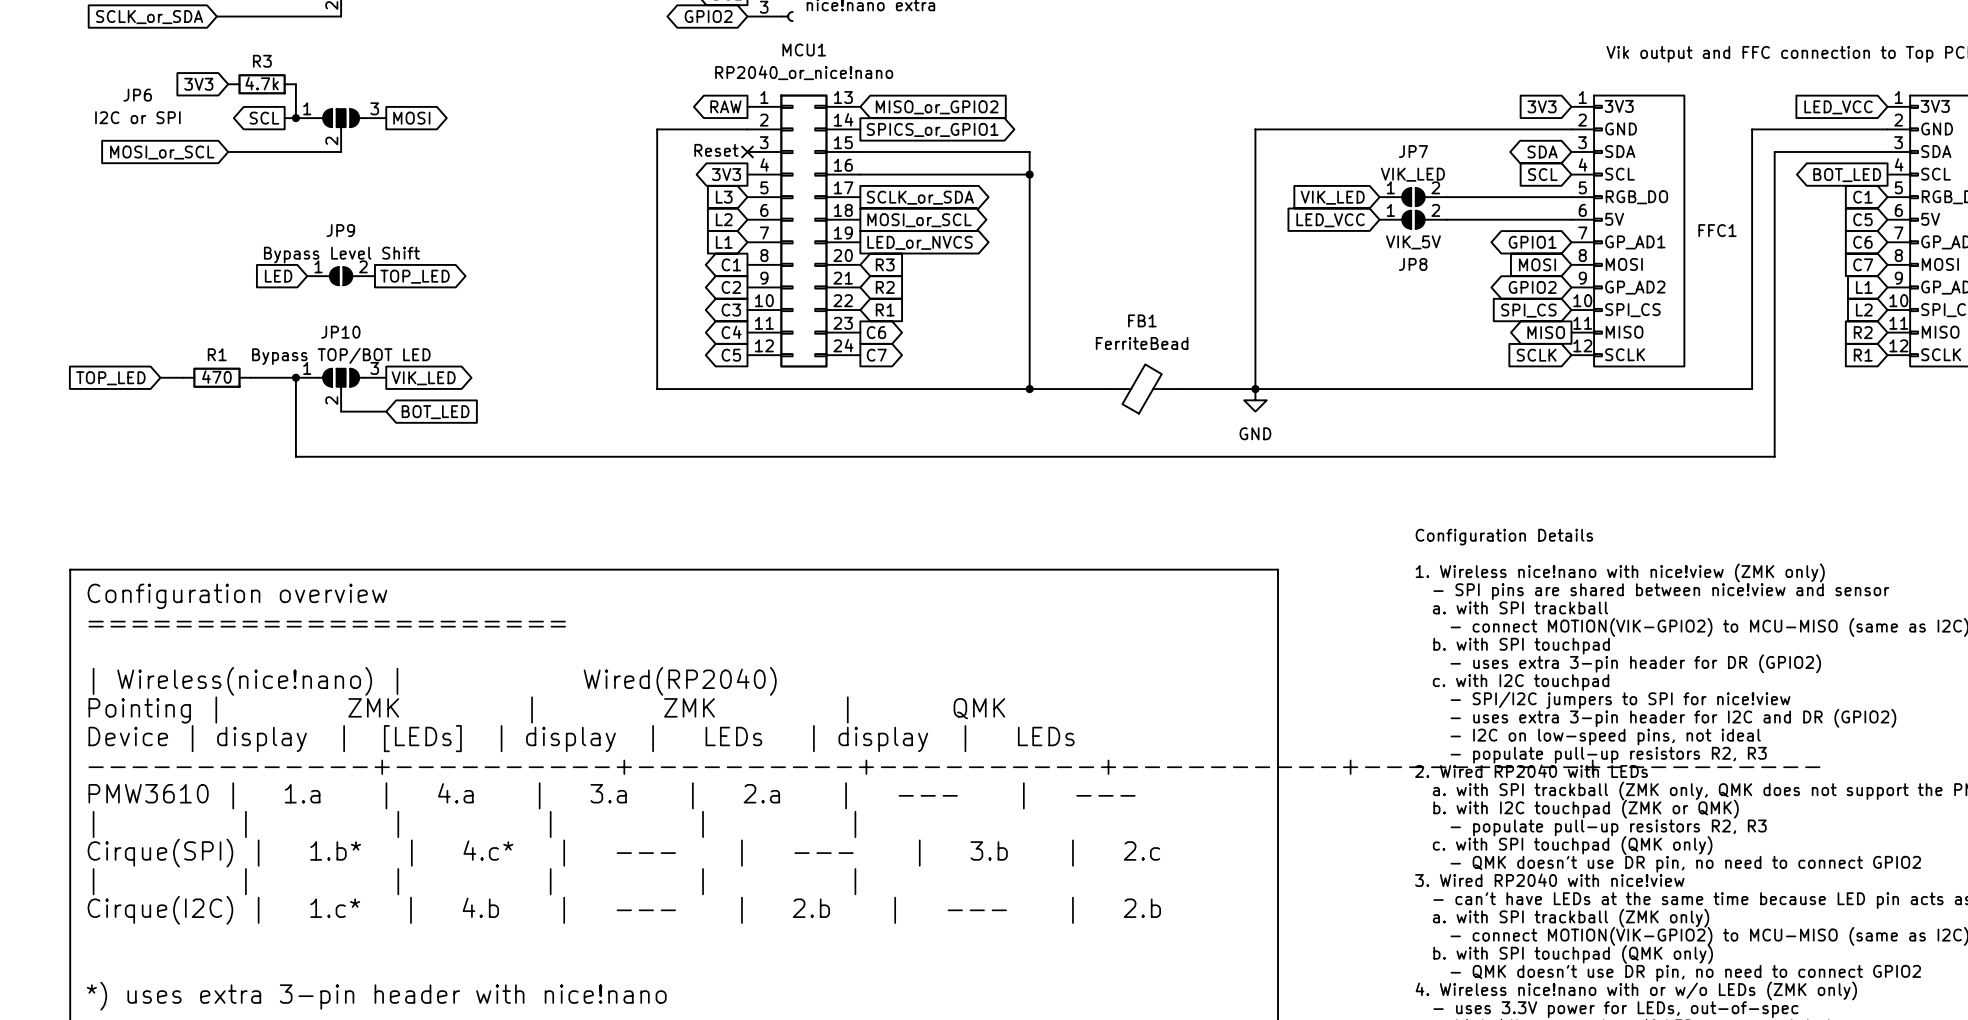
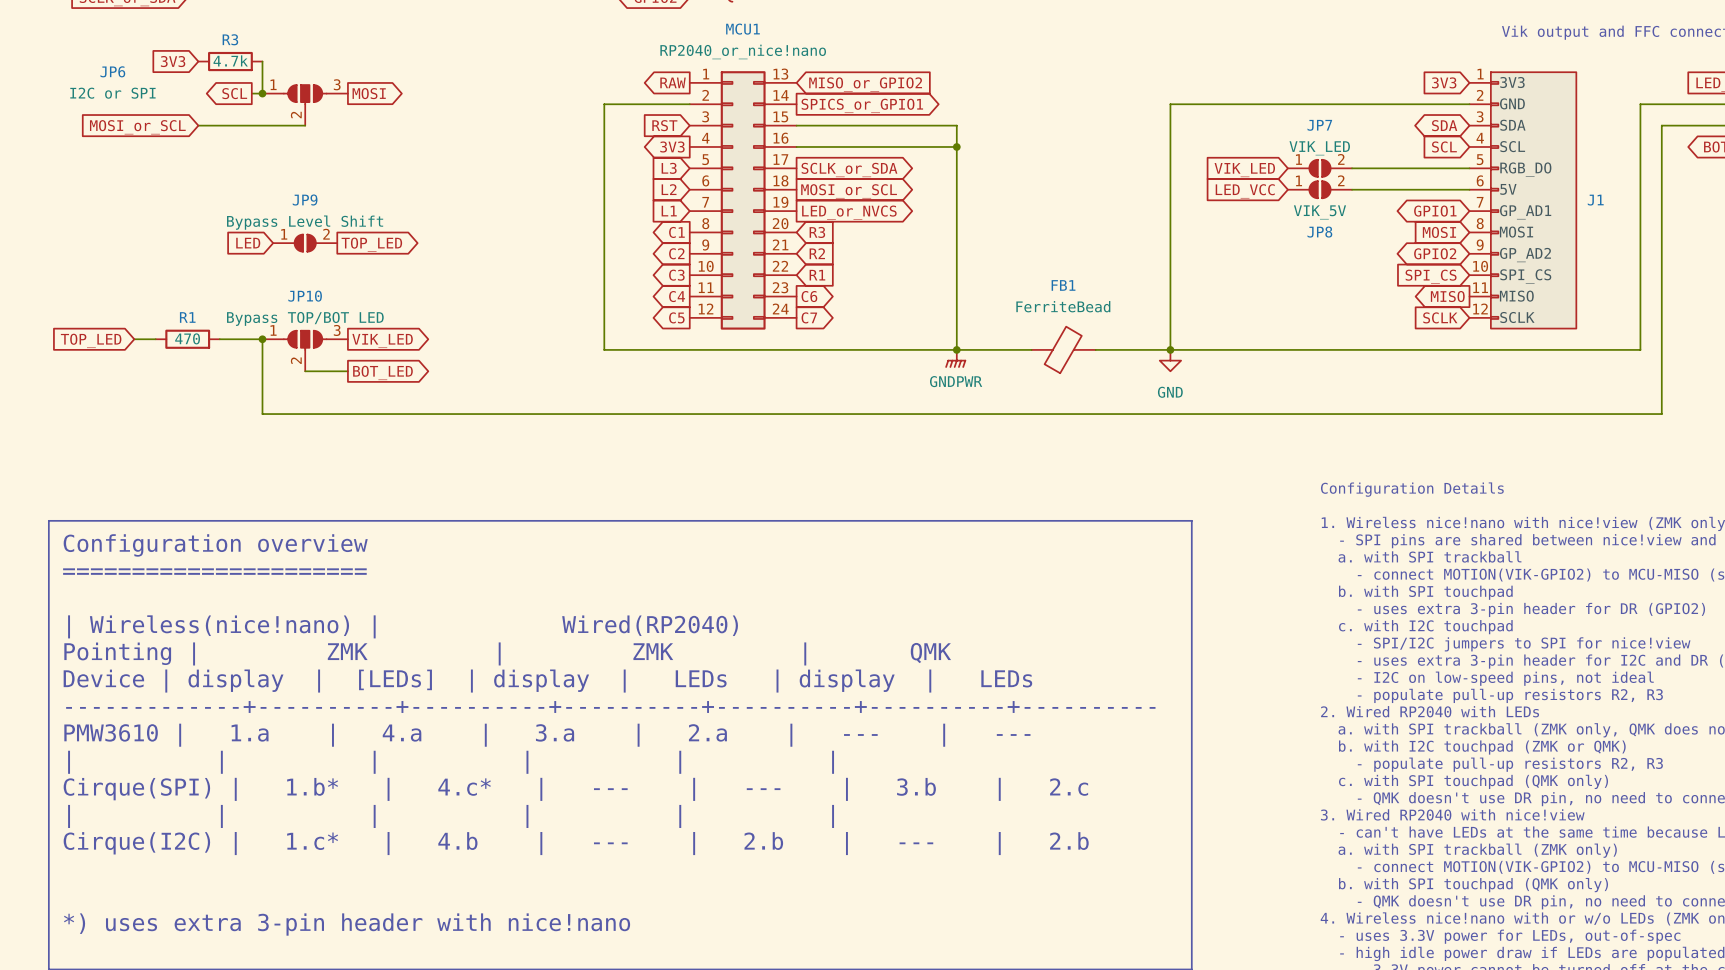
text: Reset (716, 150) -> none
global label: none -> RST (664, 125)
no-connect mark: (747, 151) -> none
FFC1 name: FFC1 (1717, 230) -> J1 (1595, 200)
power symbol: none -> GNDPWR (955, 358)
global label shape: input (435, 412) -> output (382, 372)

